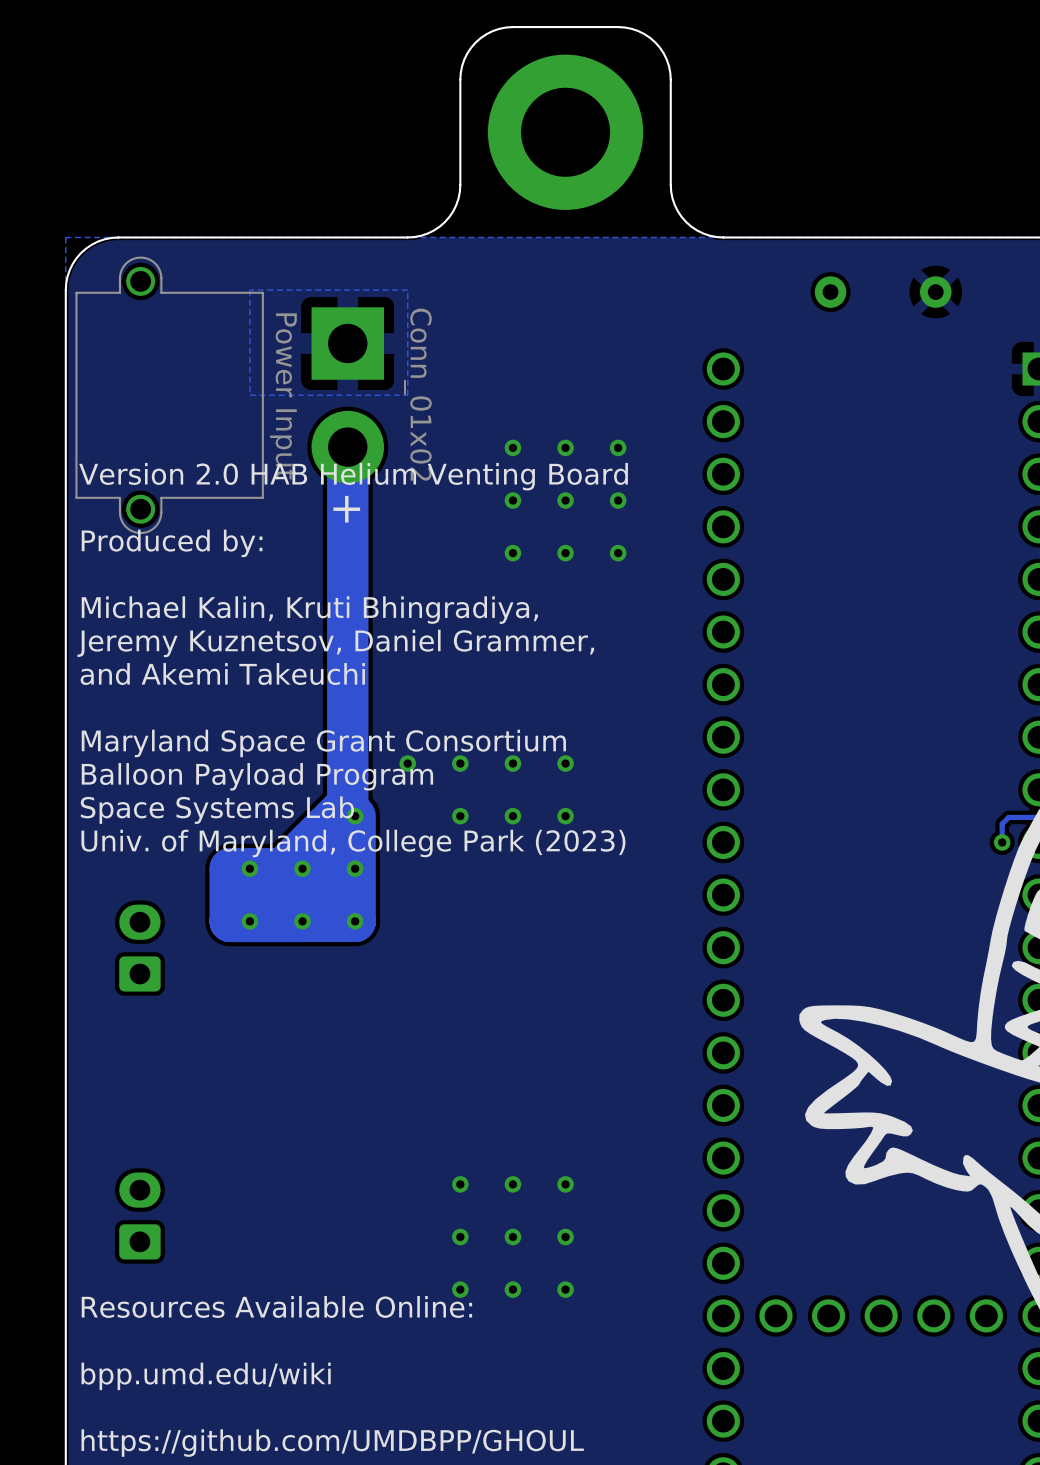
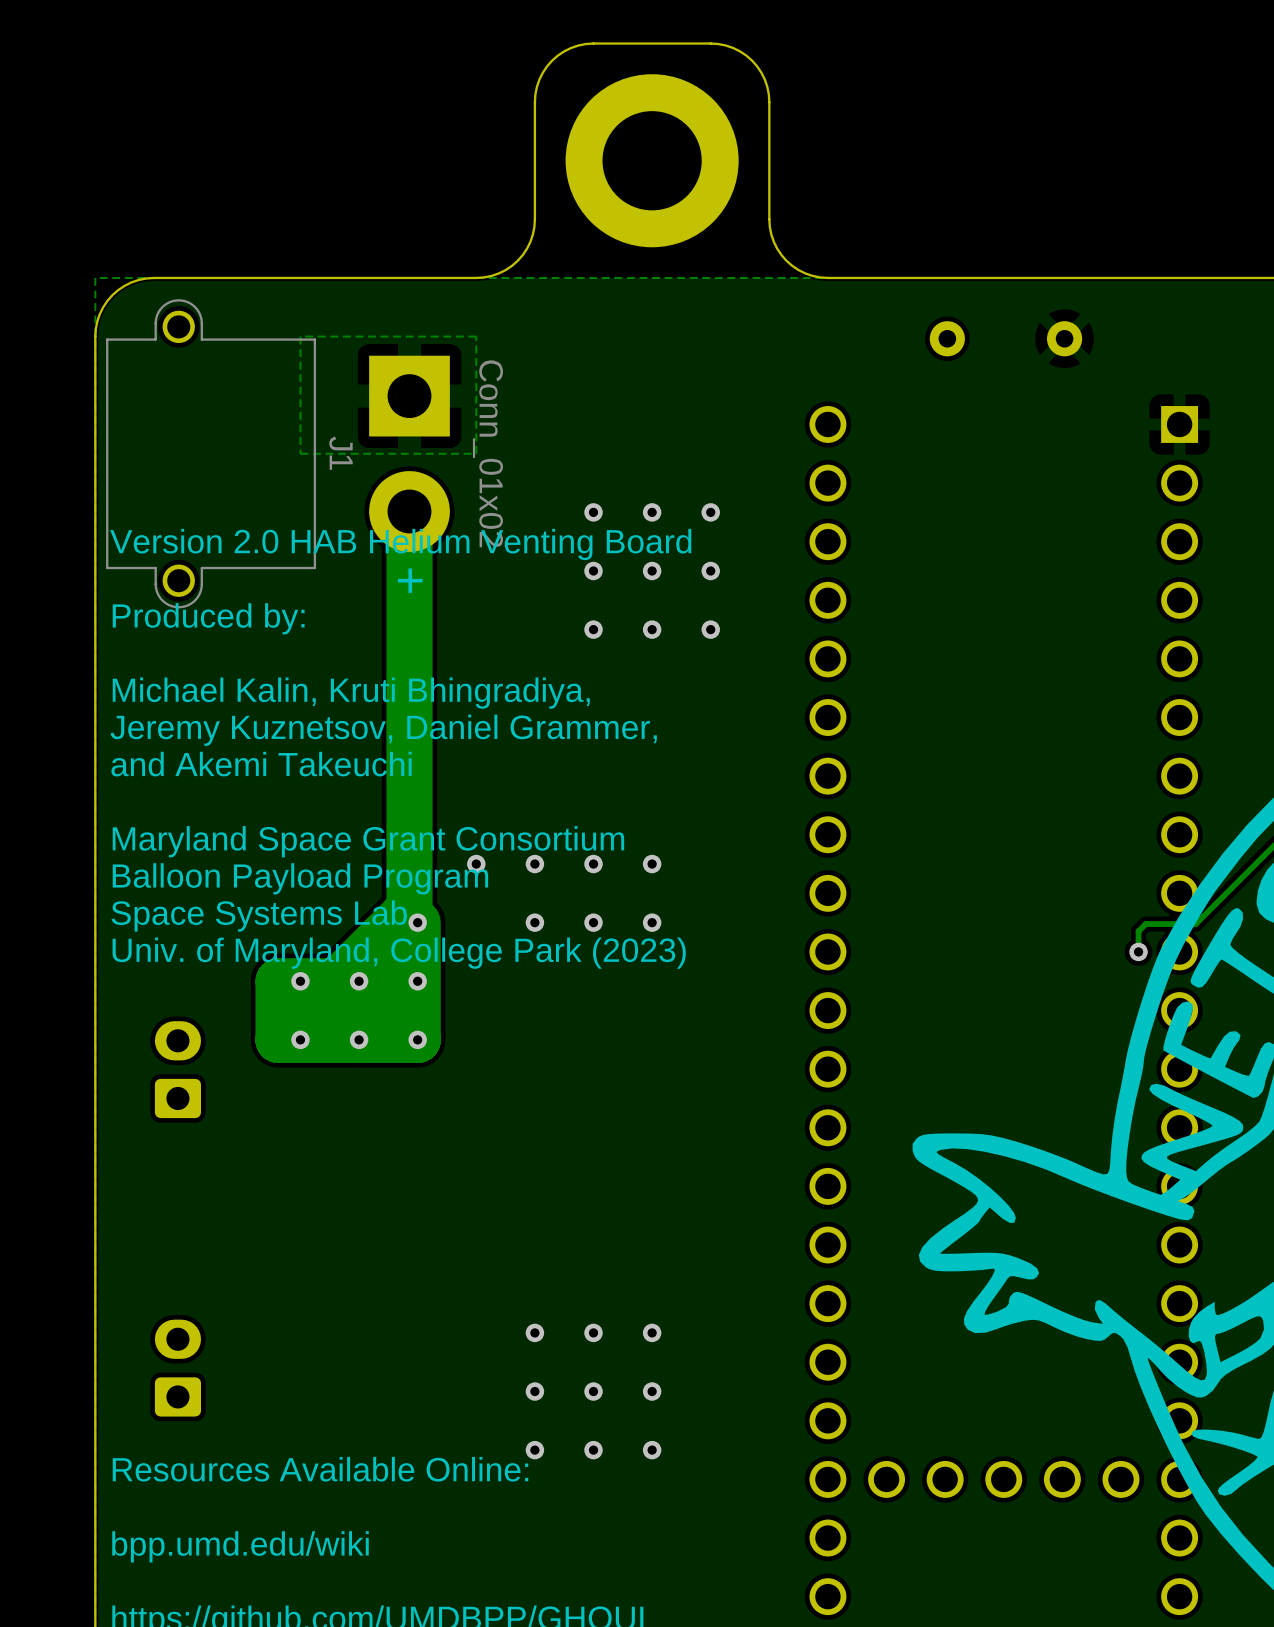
Power Input name: Power Input (283, 396) -> J1 (340, 453)

